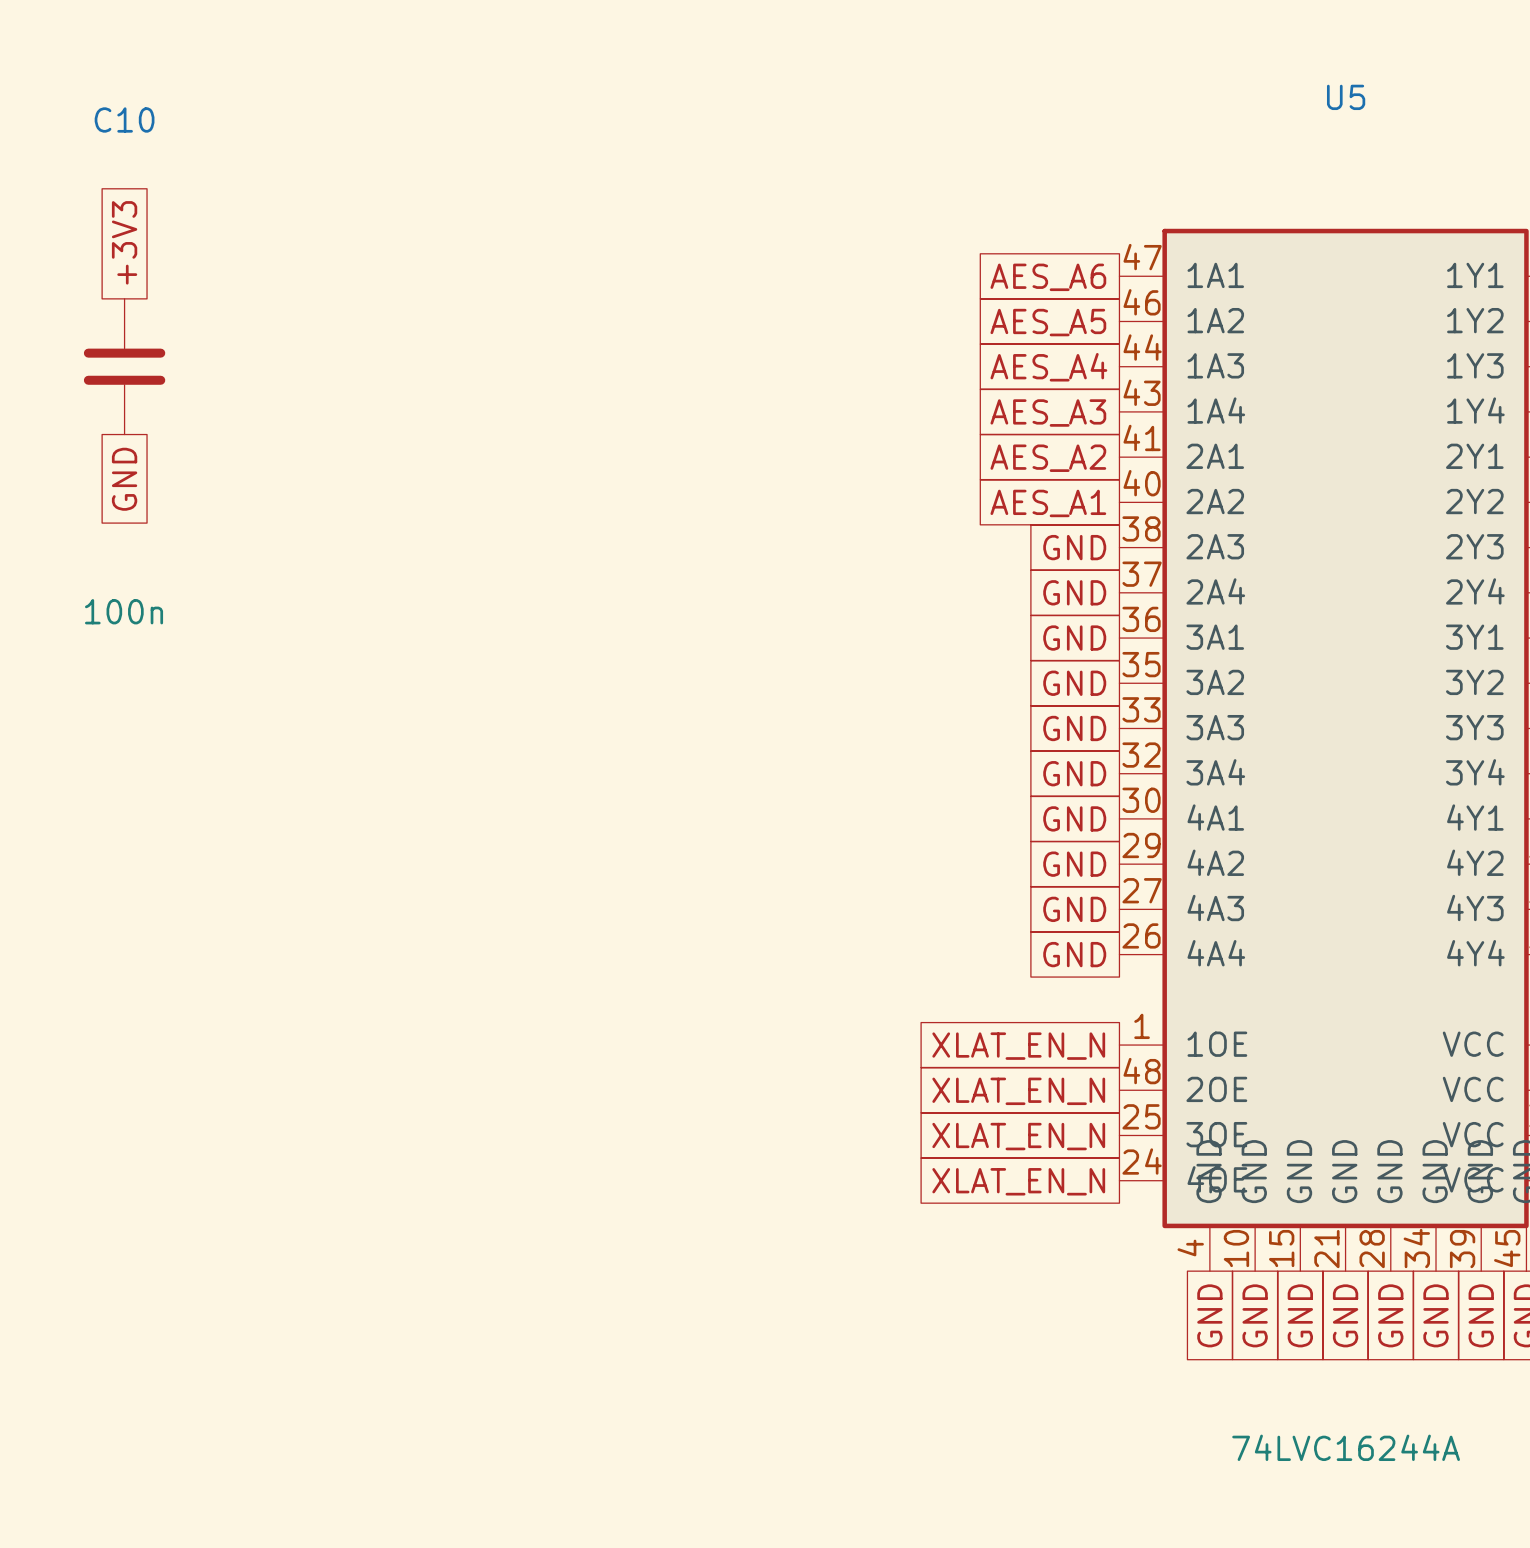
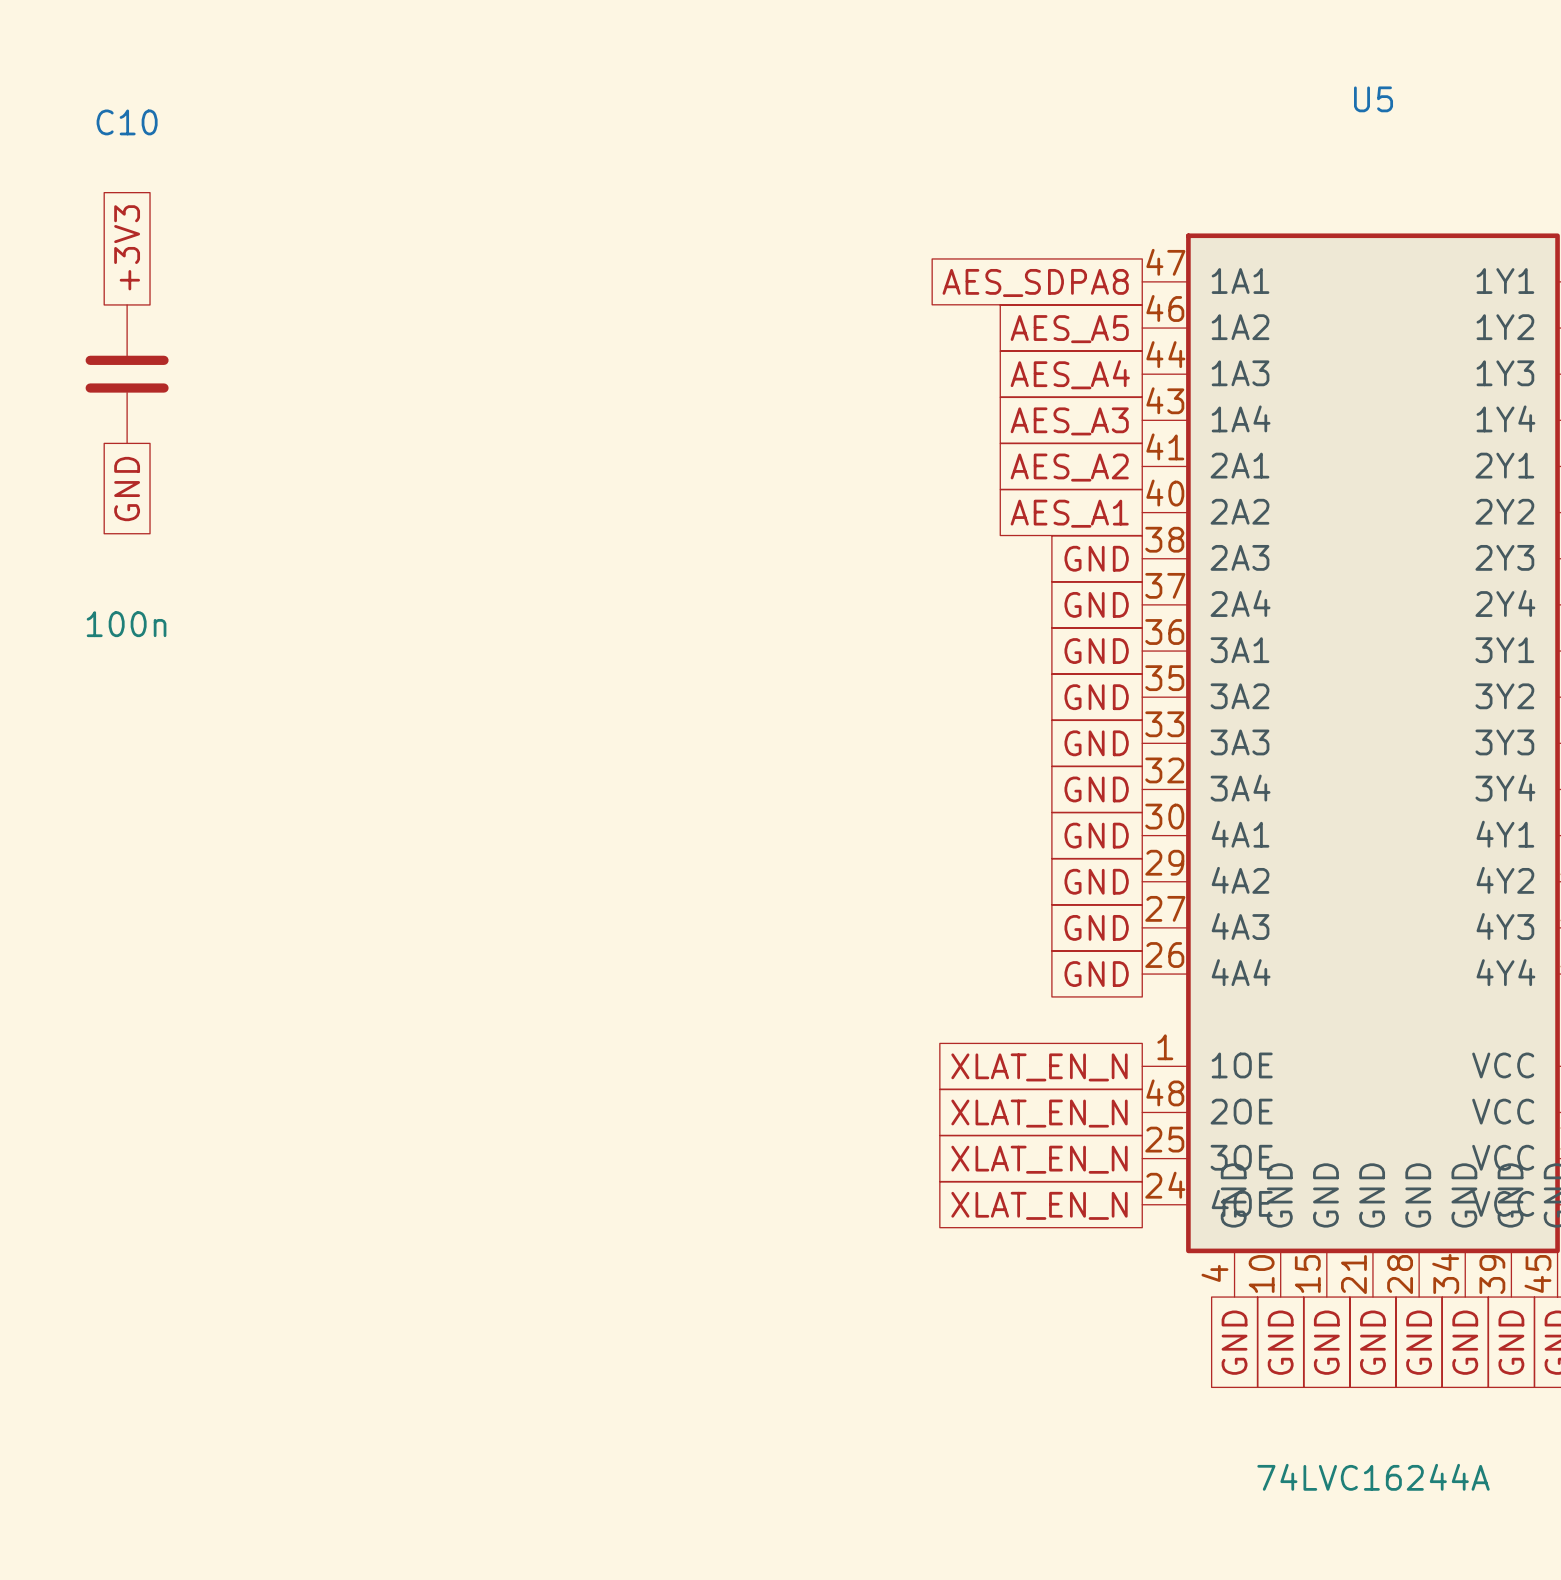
global label: AES_A6 (1048, 277) -> AES_SDPA8 (1035, 282)

